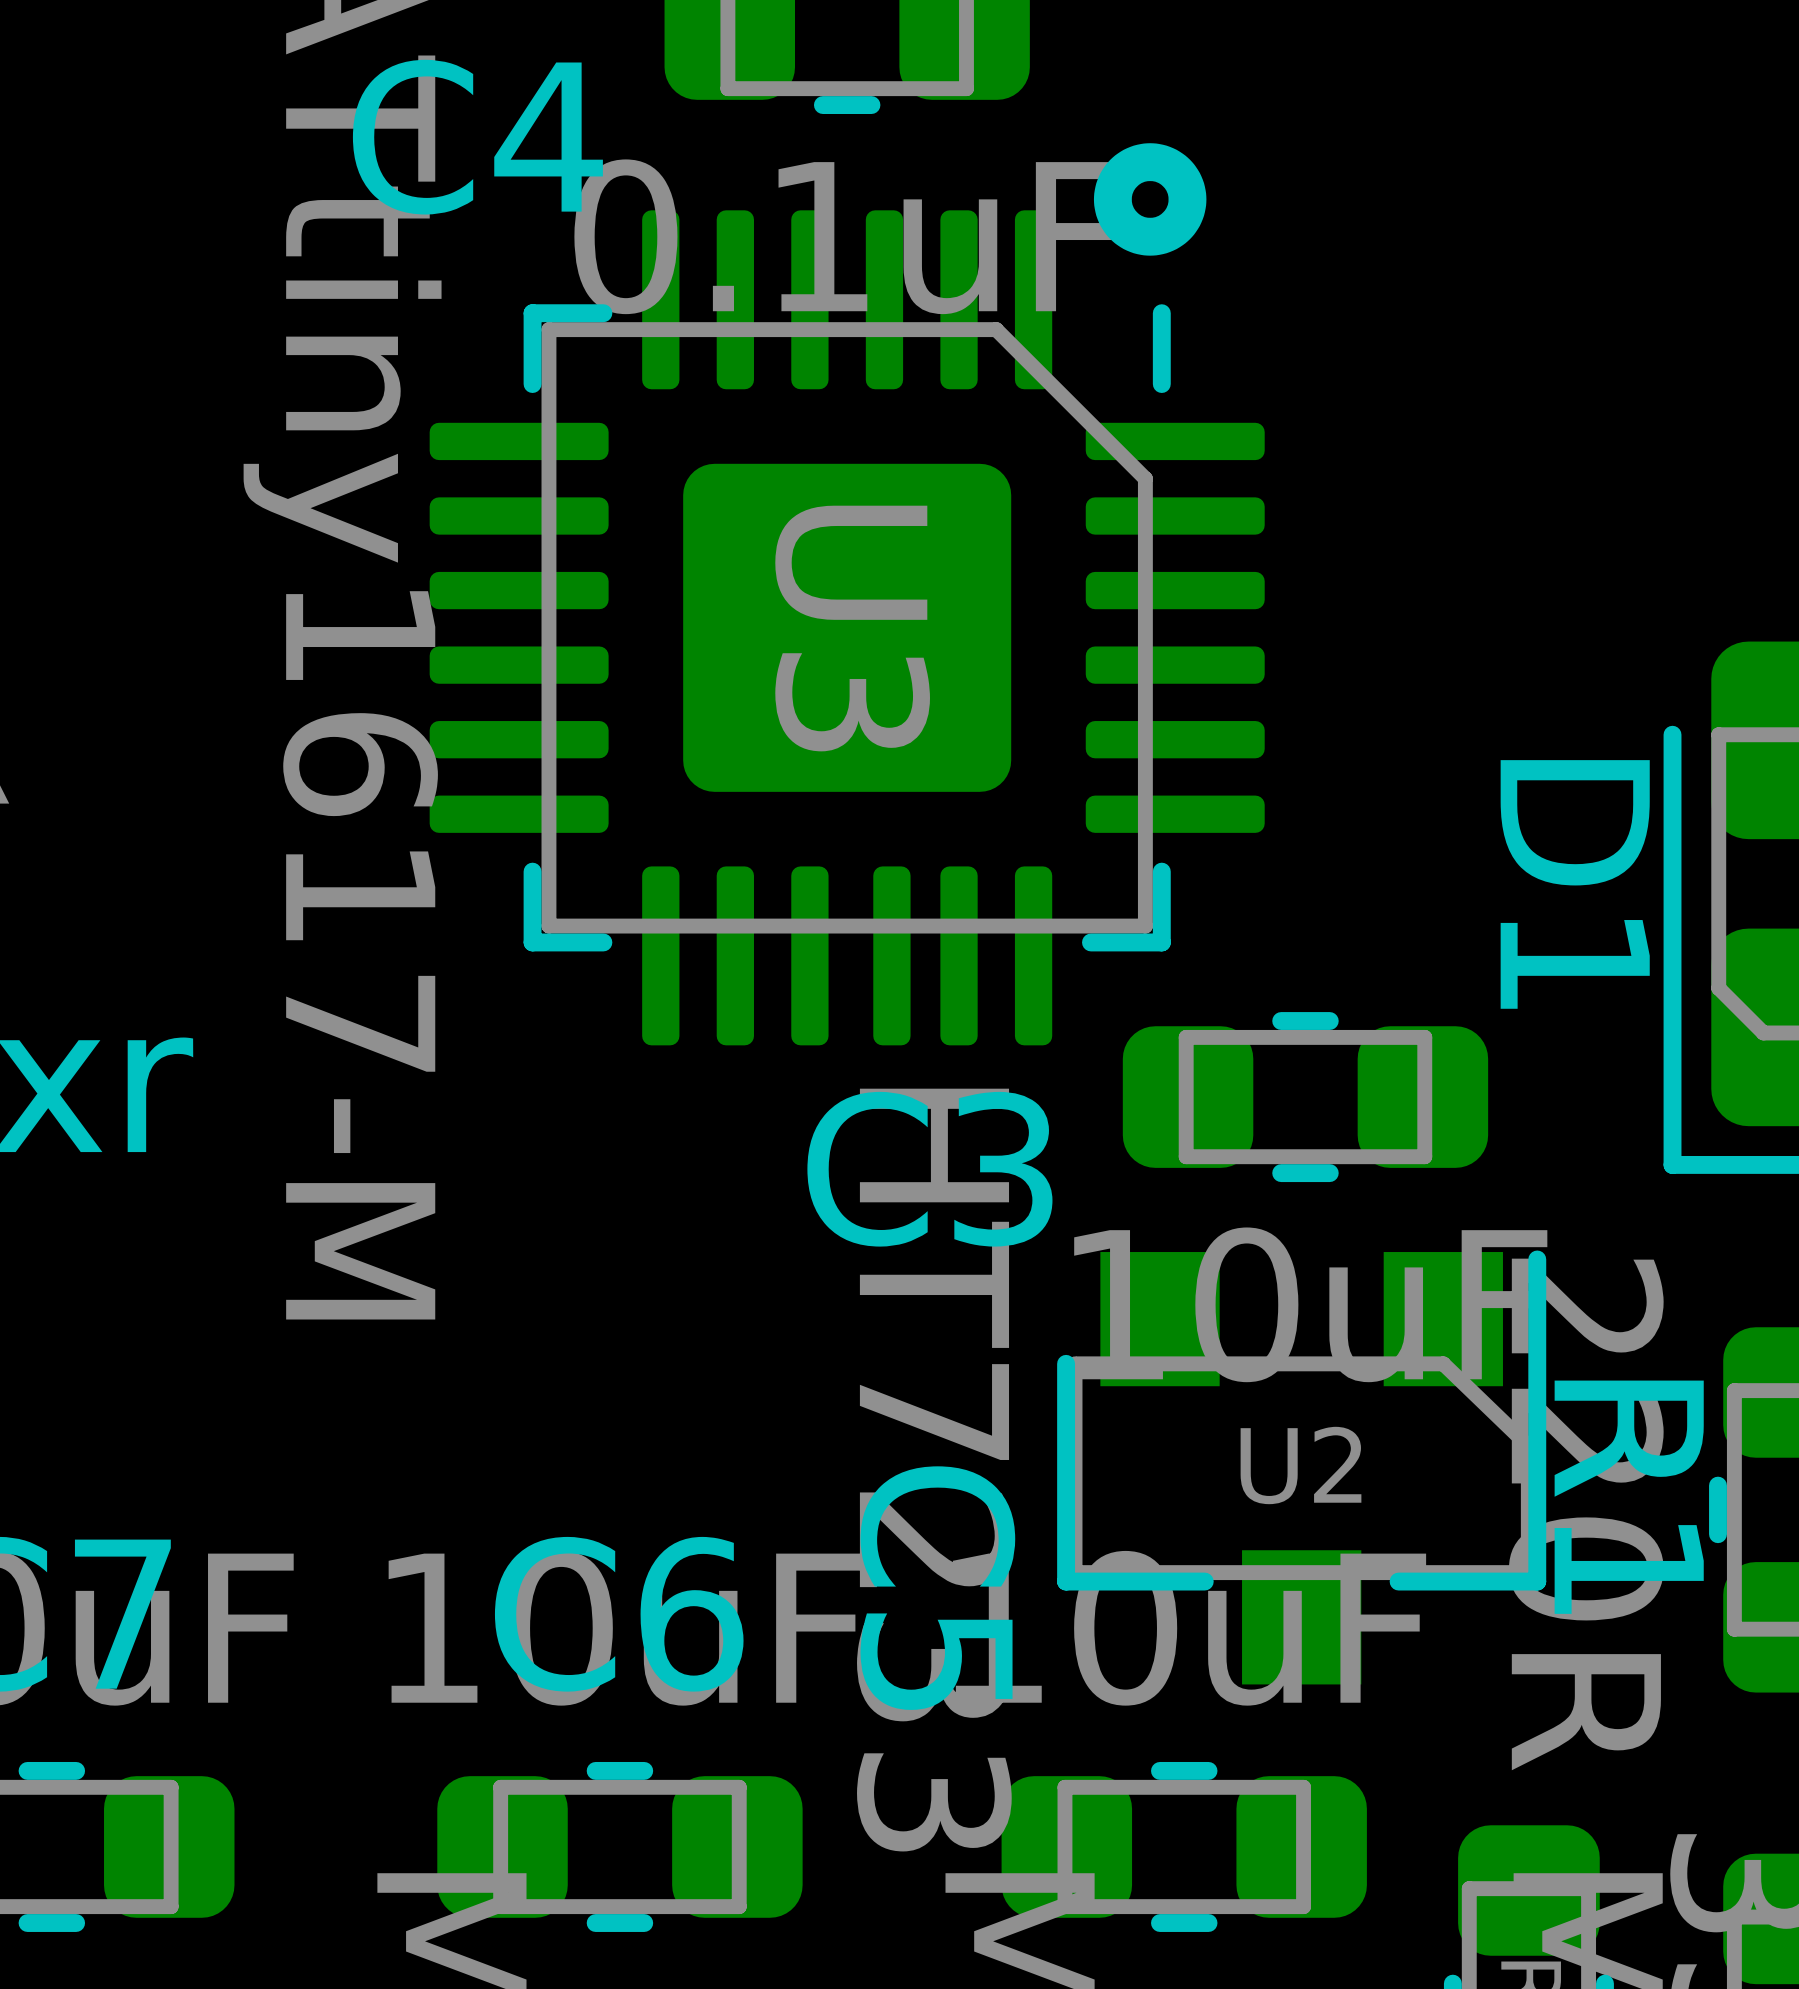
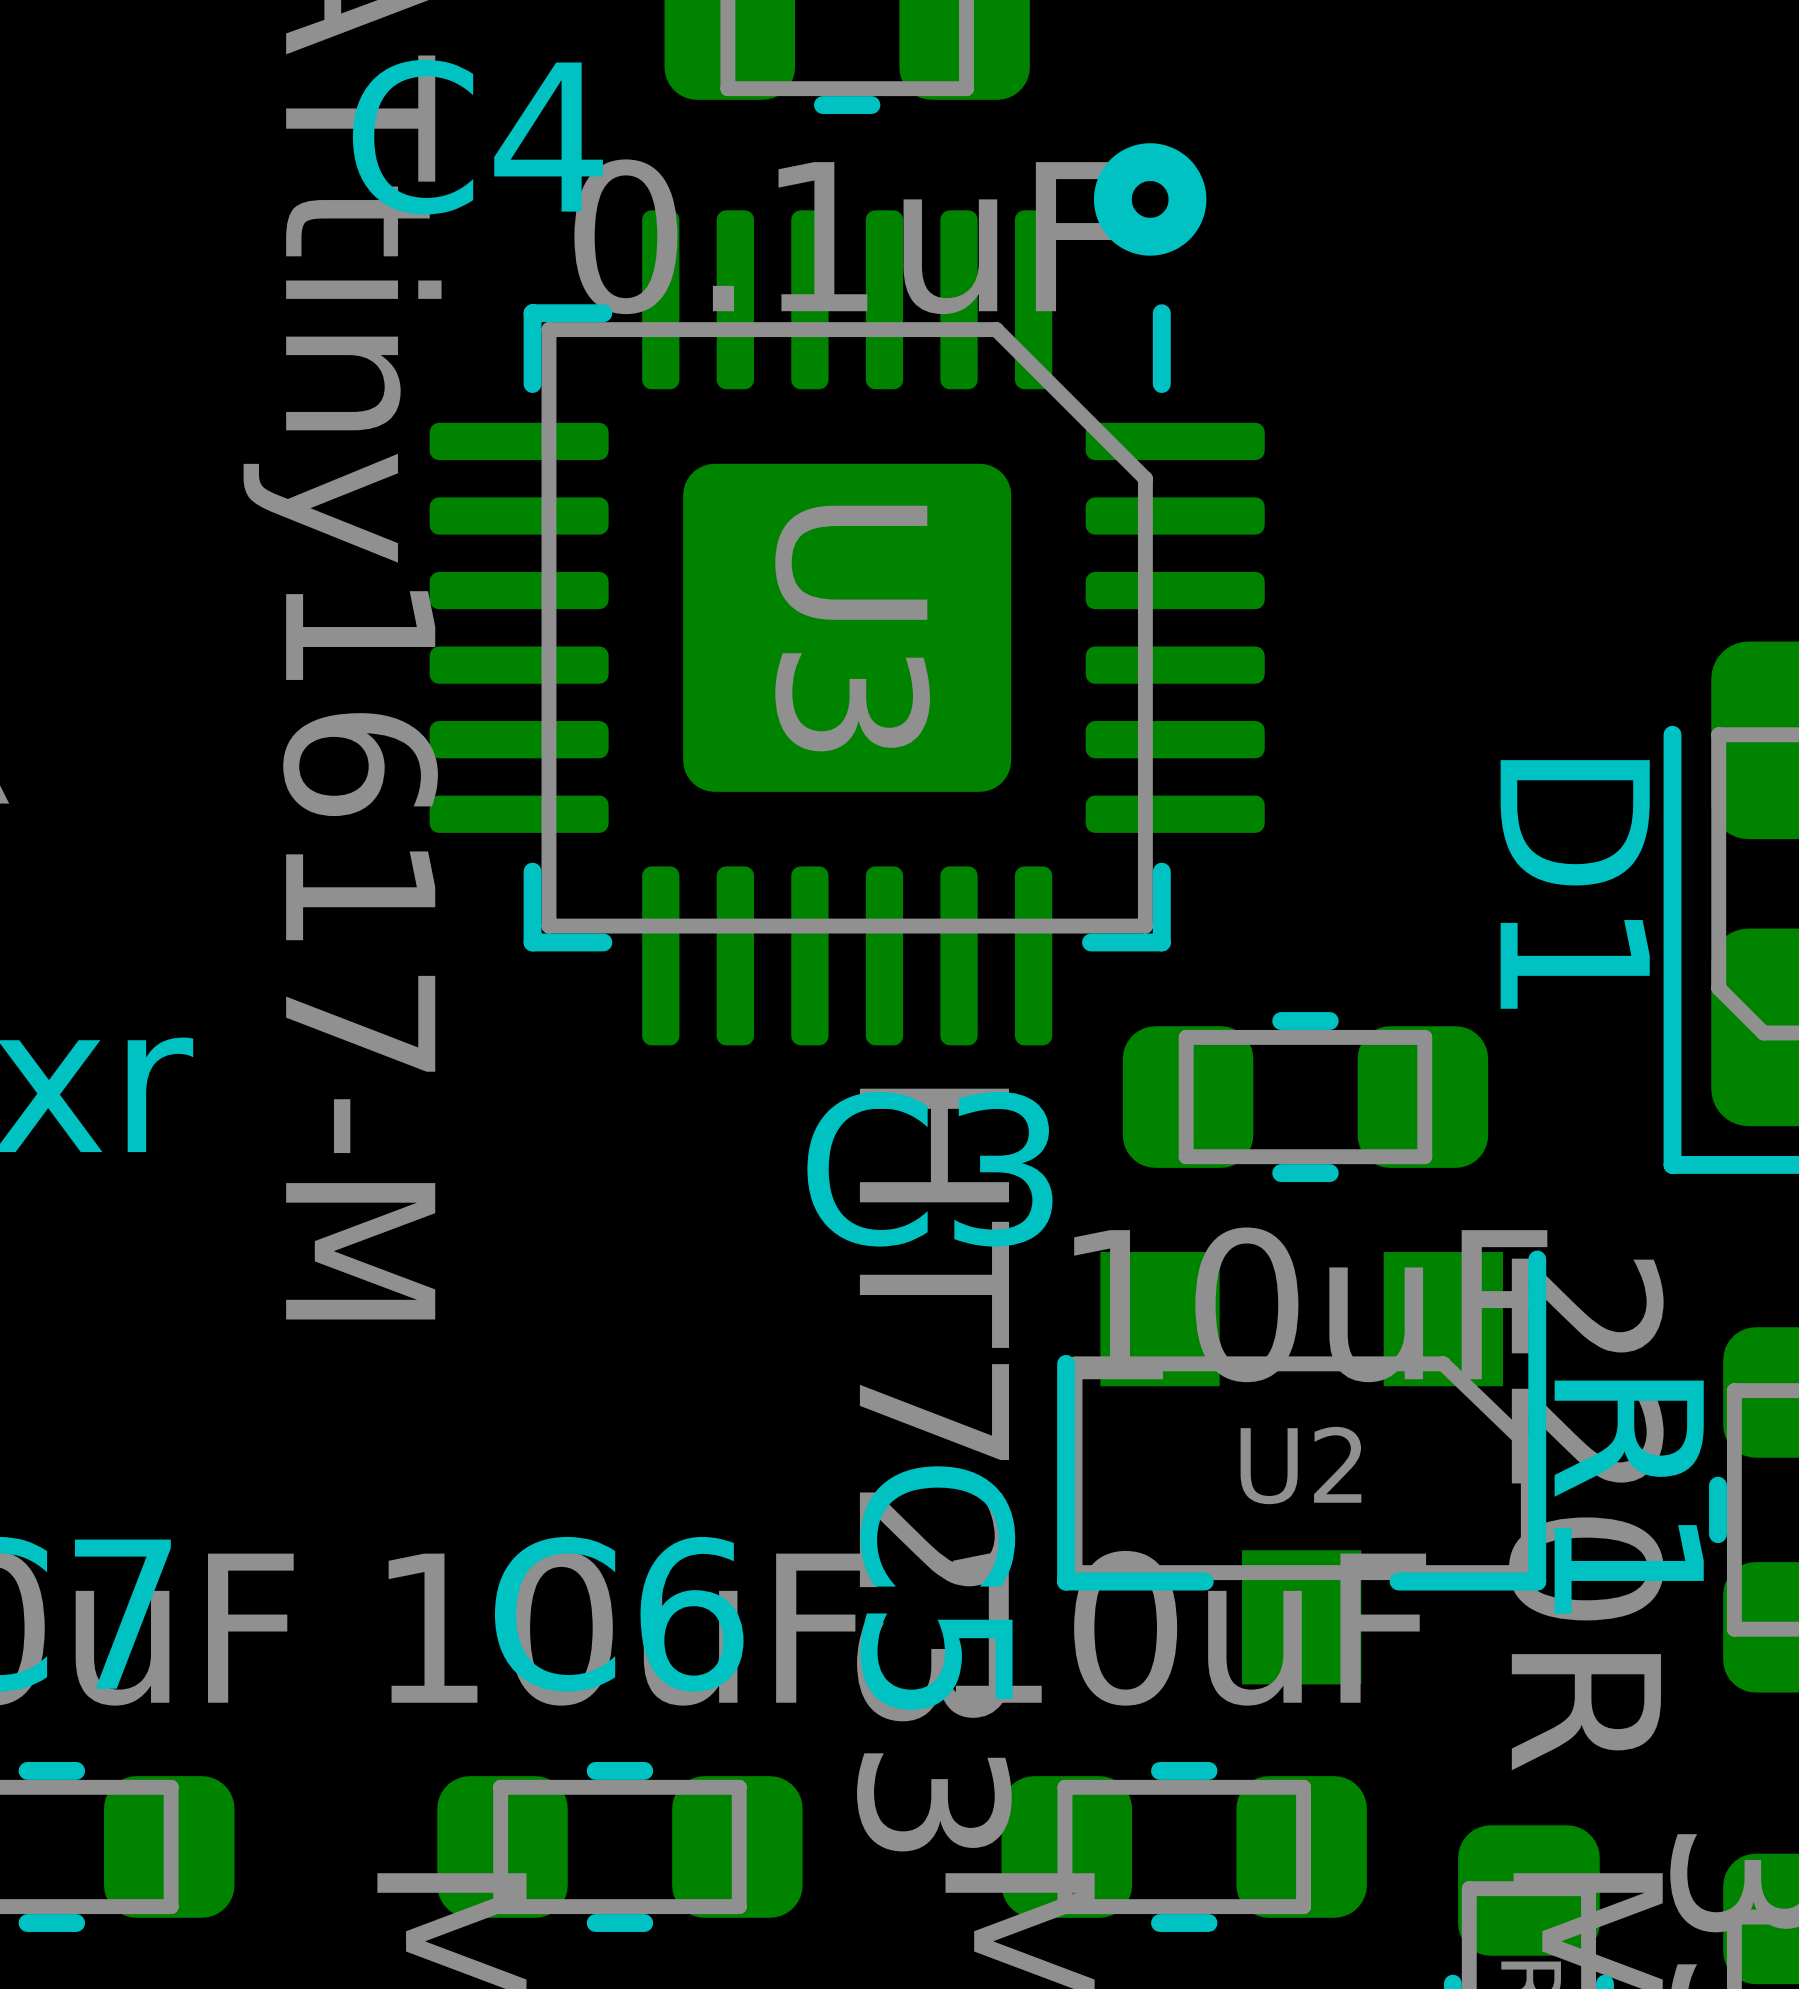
U3 footprint: [429, 210, 1265, 1046] -> [429, 210, 1265, 1046]

